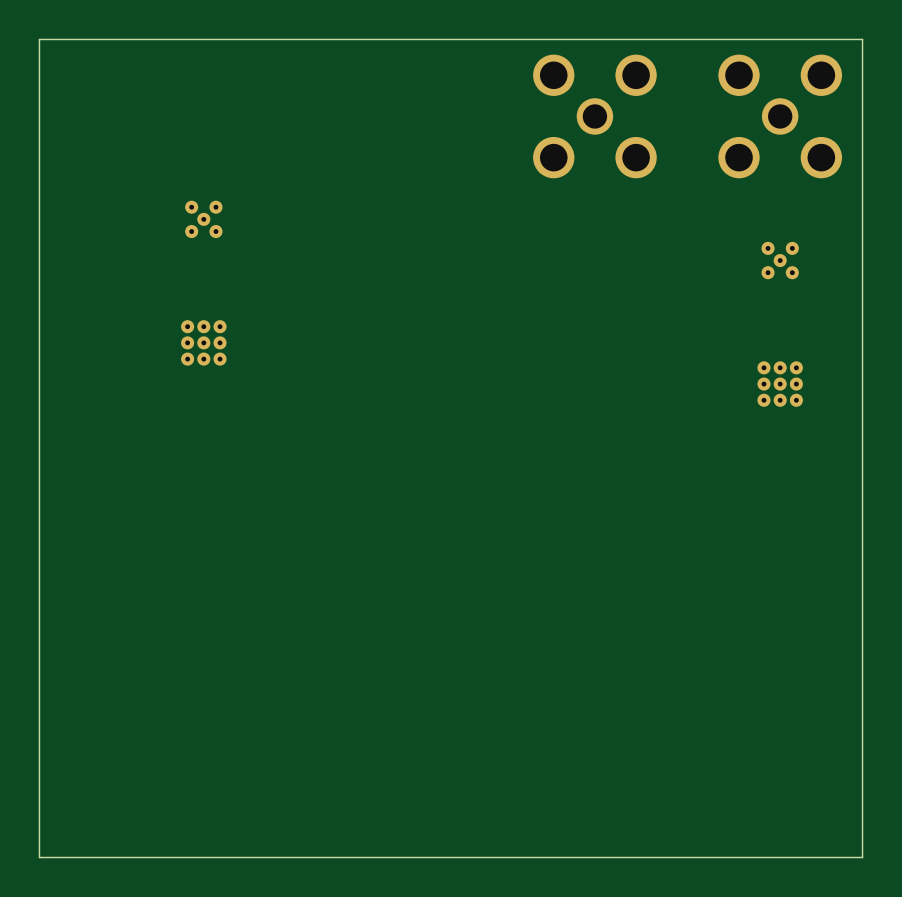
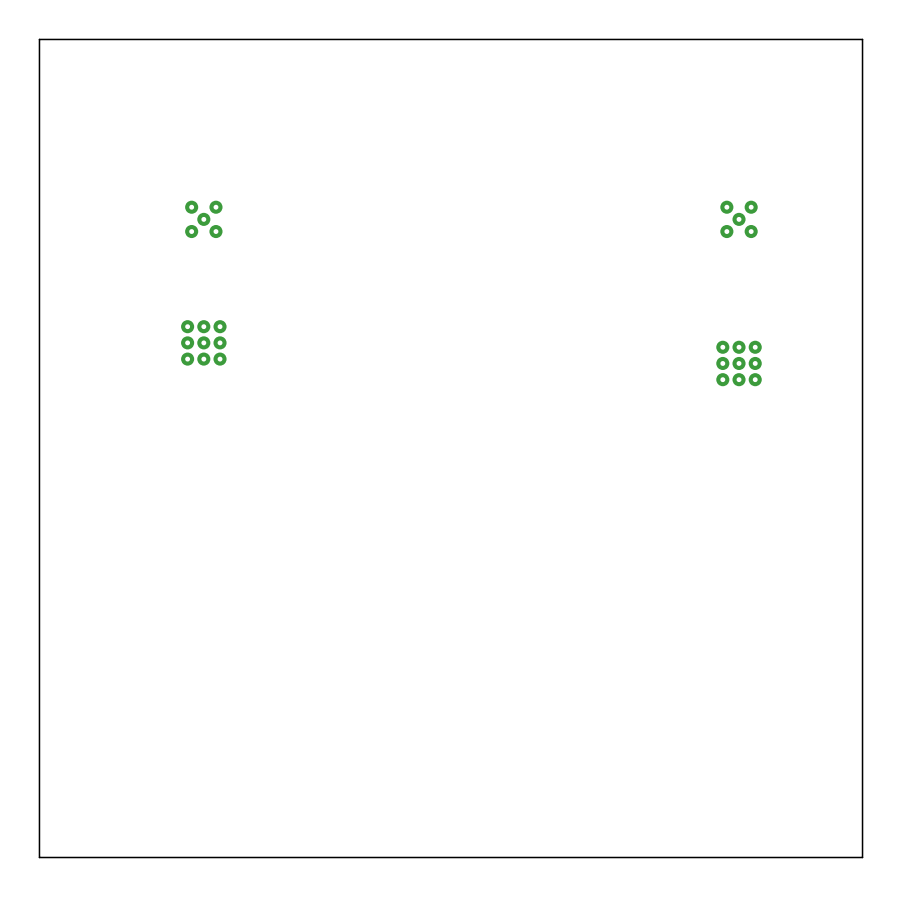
part: (594, 116) -> none
part: (780, 116) -> none
part position: (780, 260) -> (739, 219)
part position: (780, 384) -> (739, 363)

